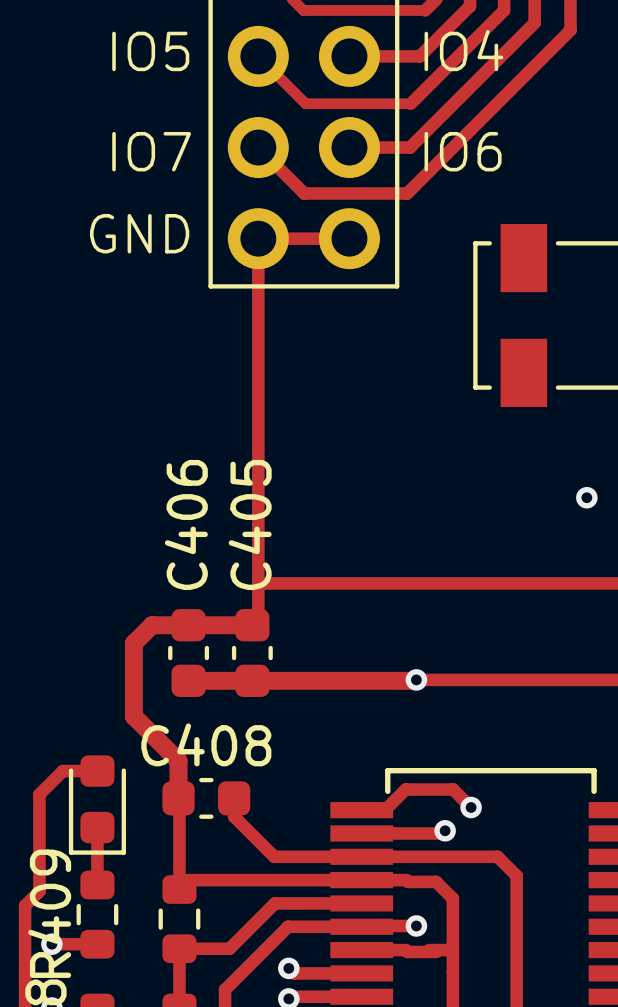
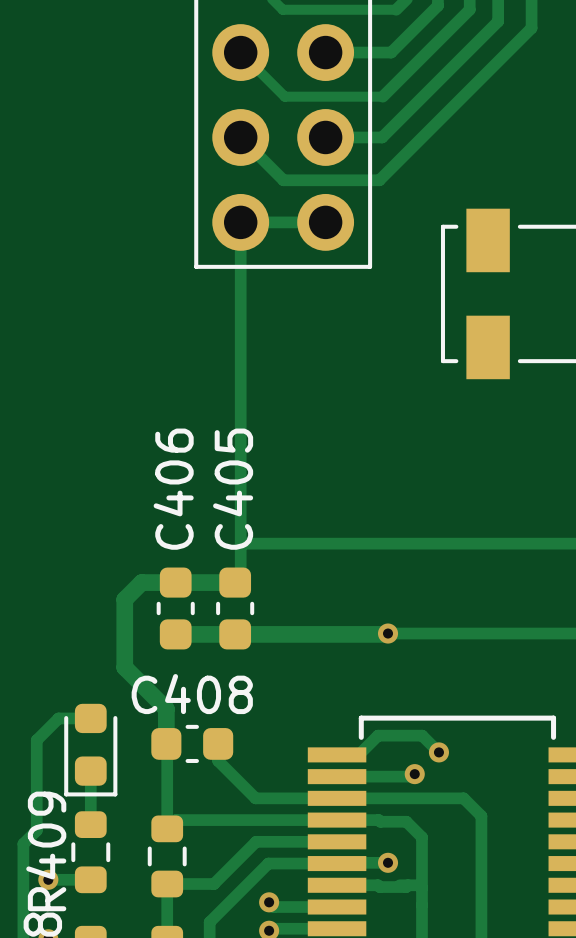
text: IO4 (463, 50) -> none
text: IO5 (150, 51) -> none
text: IO7 (151, 151) -> none
text: IO6 (463, 151) -> none
text: GND (139, 233) -> none
via: (586, 497) -> none

